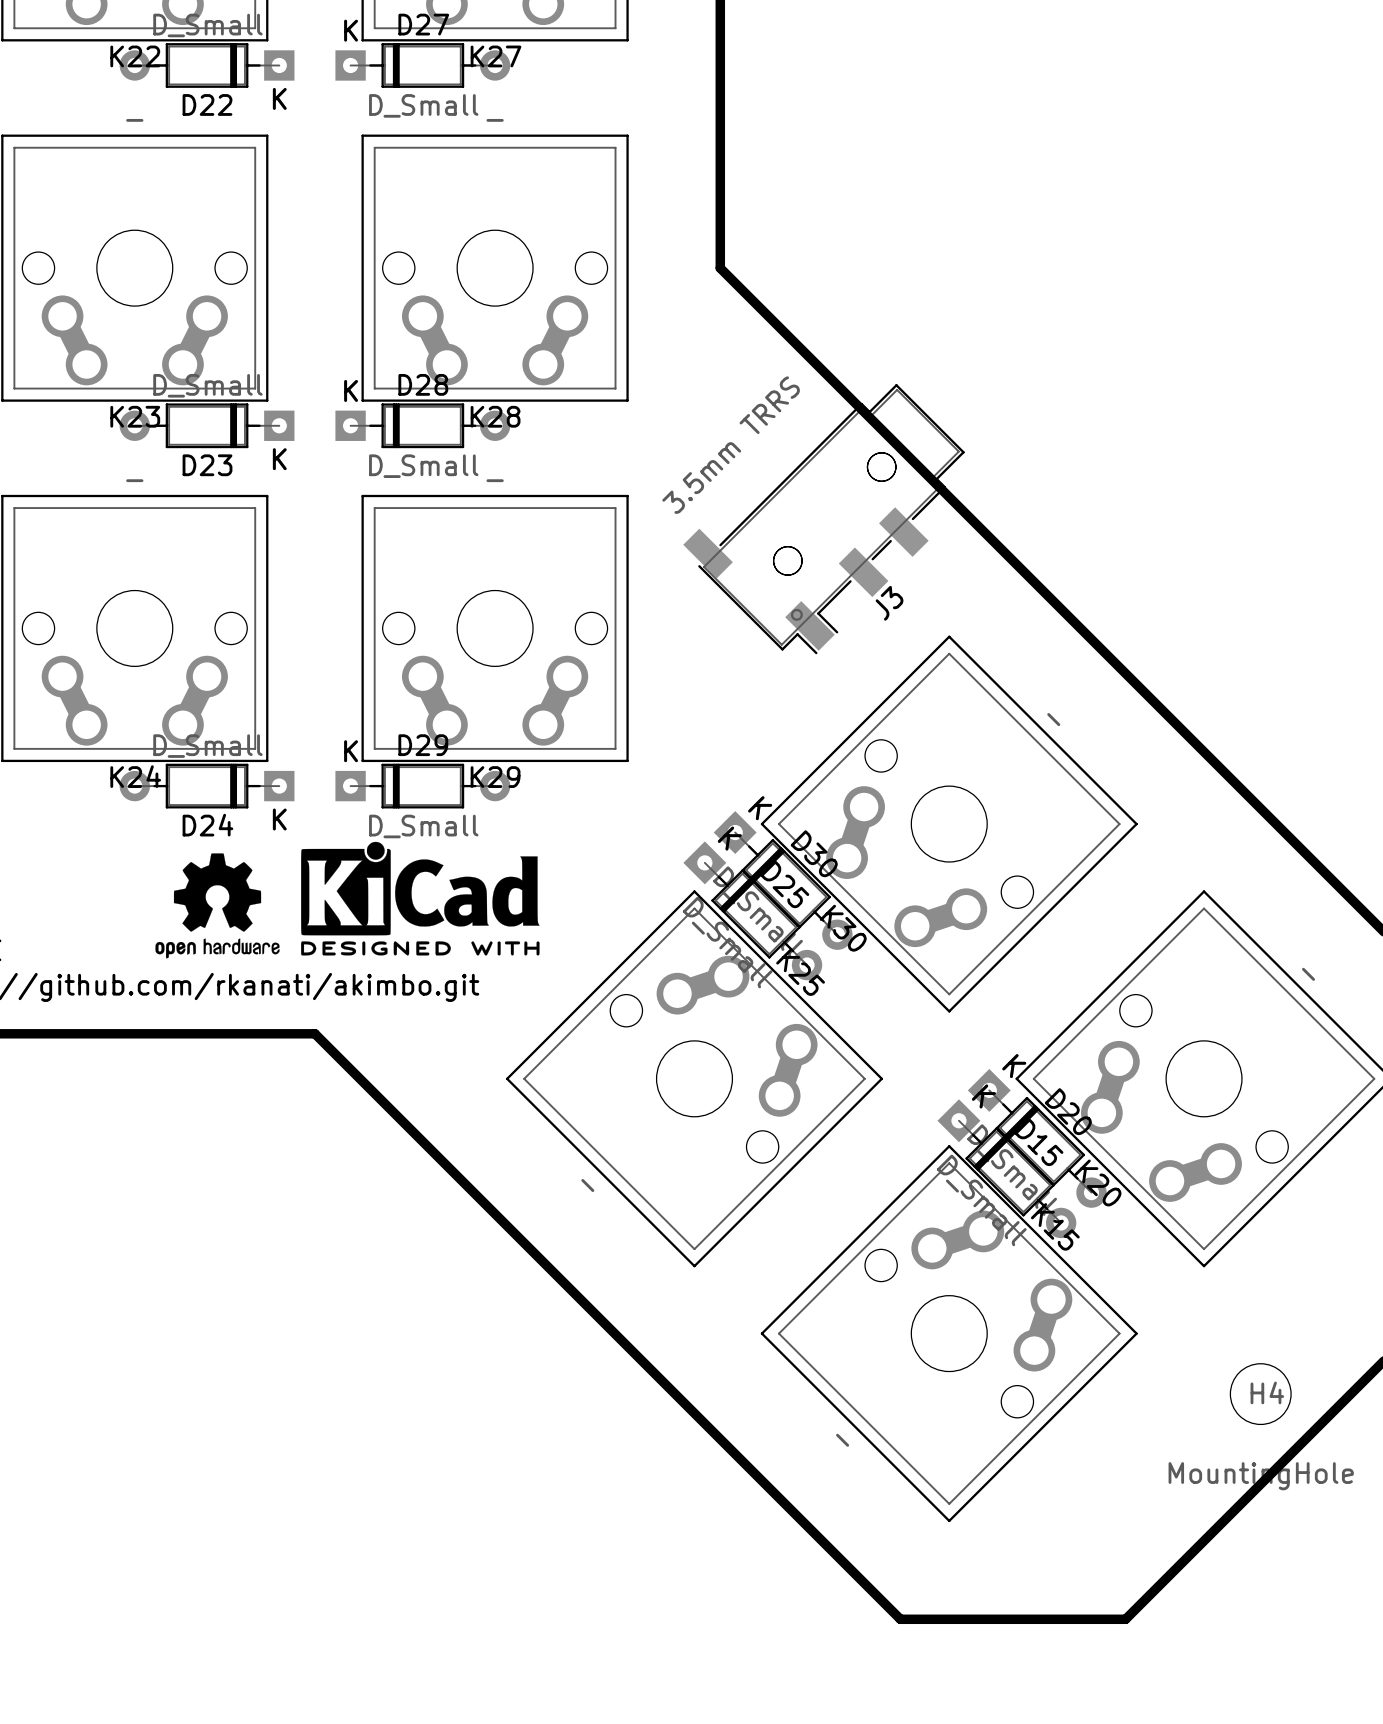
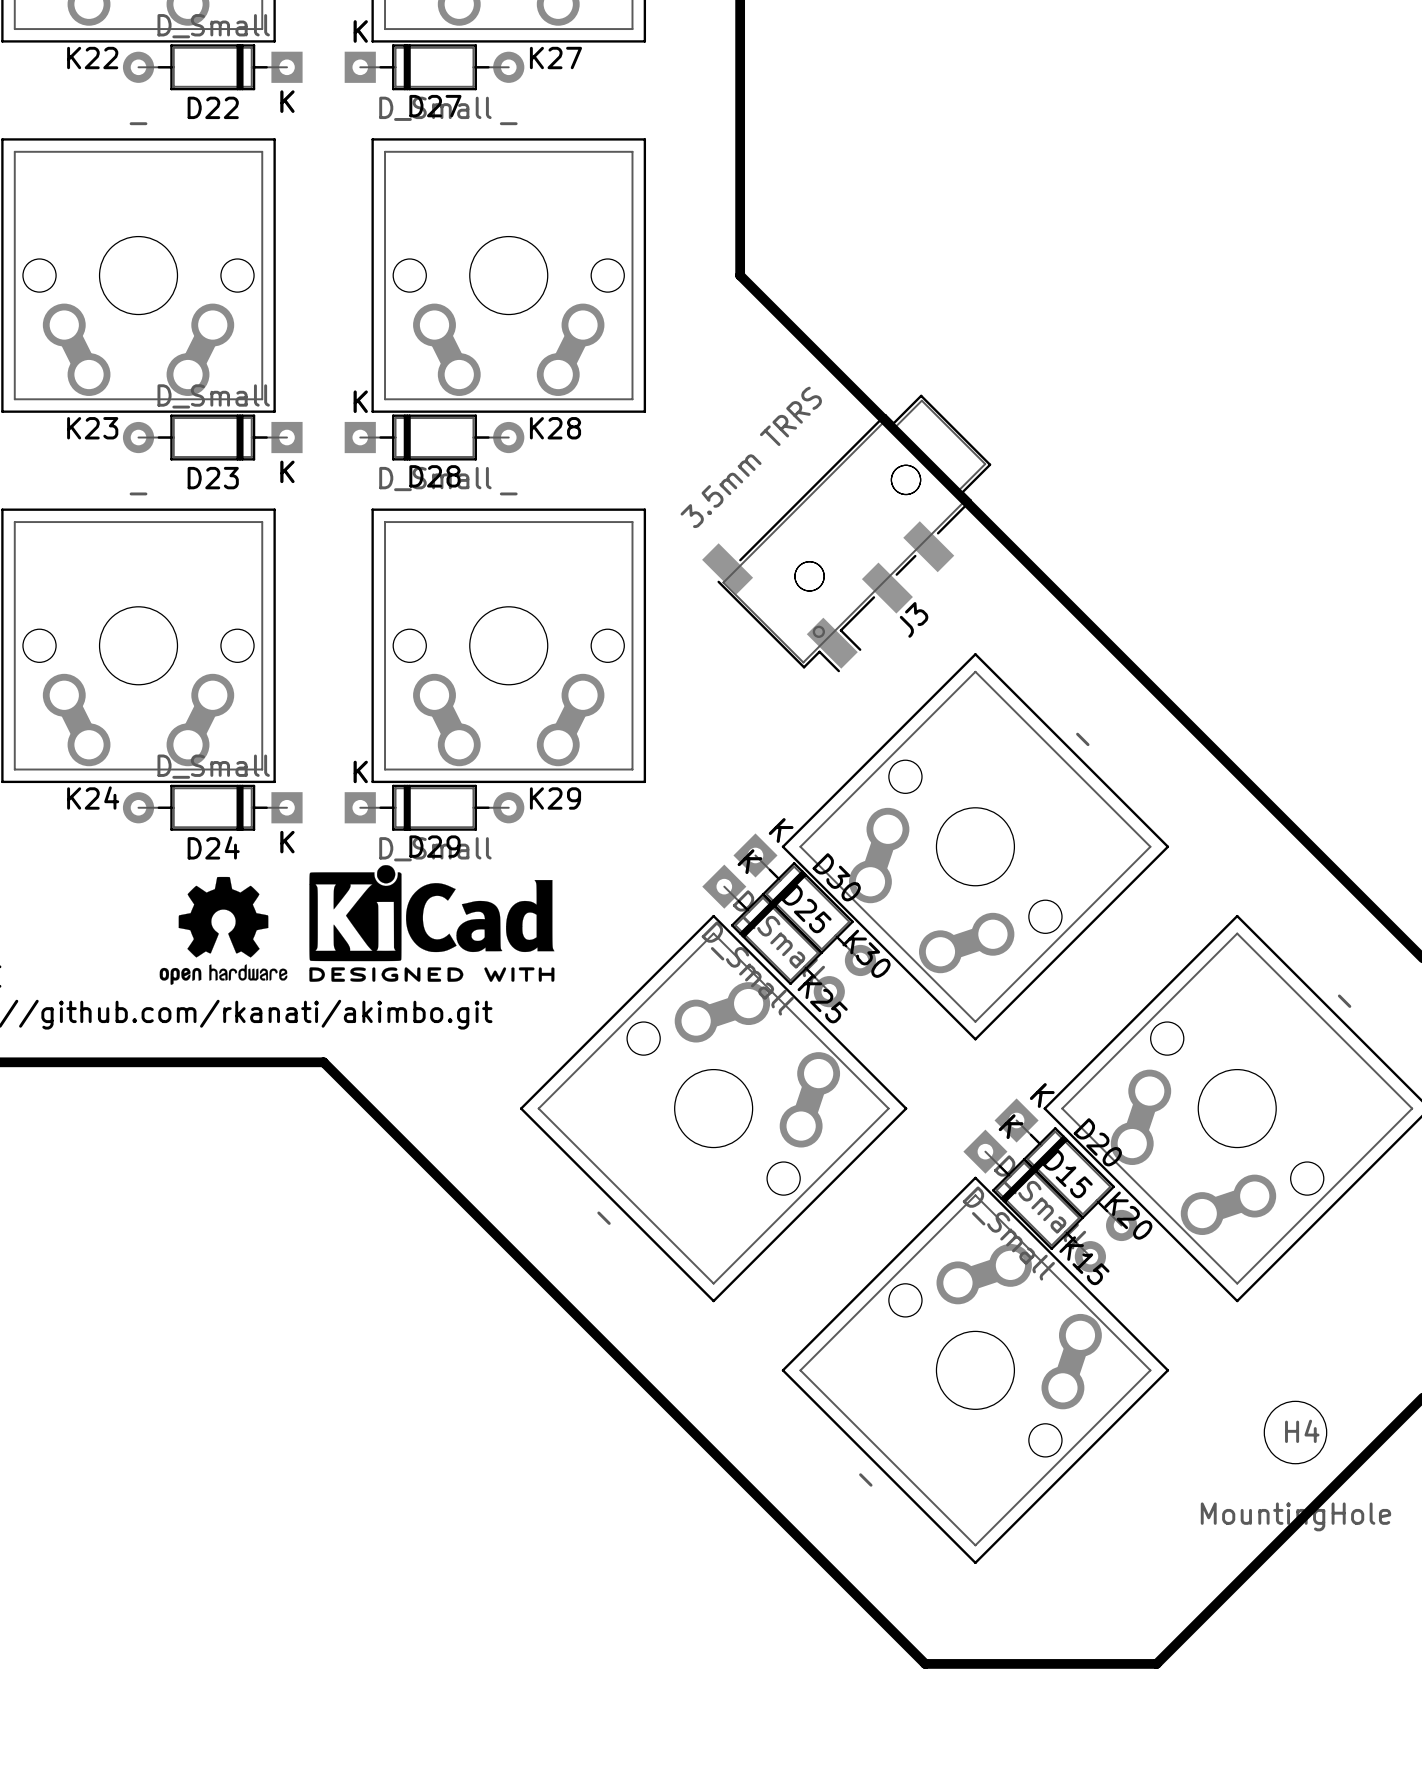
D27 name position: D27 (423, 24) -> D27 (435, 106)
K22 name position: K22 (135, 56) -> K22 (92, 58)
K27 name position: K27 (496, 56) -> K27 (555, 58)
D28 name position: D28 (423, 384) -> D28 (434, 476)
K23 name position: K23 (135, 416) -> K23 (92, 428)
K28 name position: K28 (495, 416) -> K28 (555, 428)
D29 name position: D29 (423, 745) -> D29 (434, 846)
K24 name position: K24 (135, 776) -> K24 (93, 798)
K29 name position: K29 (495, 777) -> K29 (555, 798)

